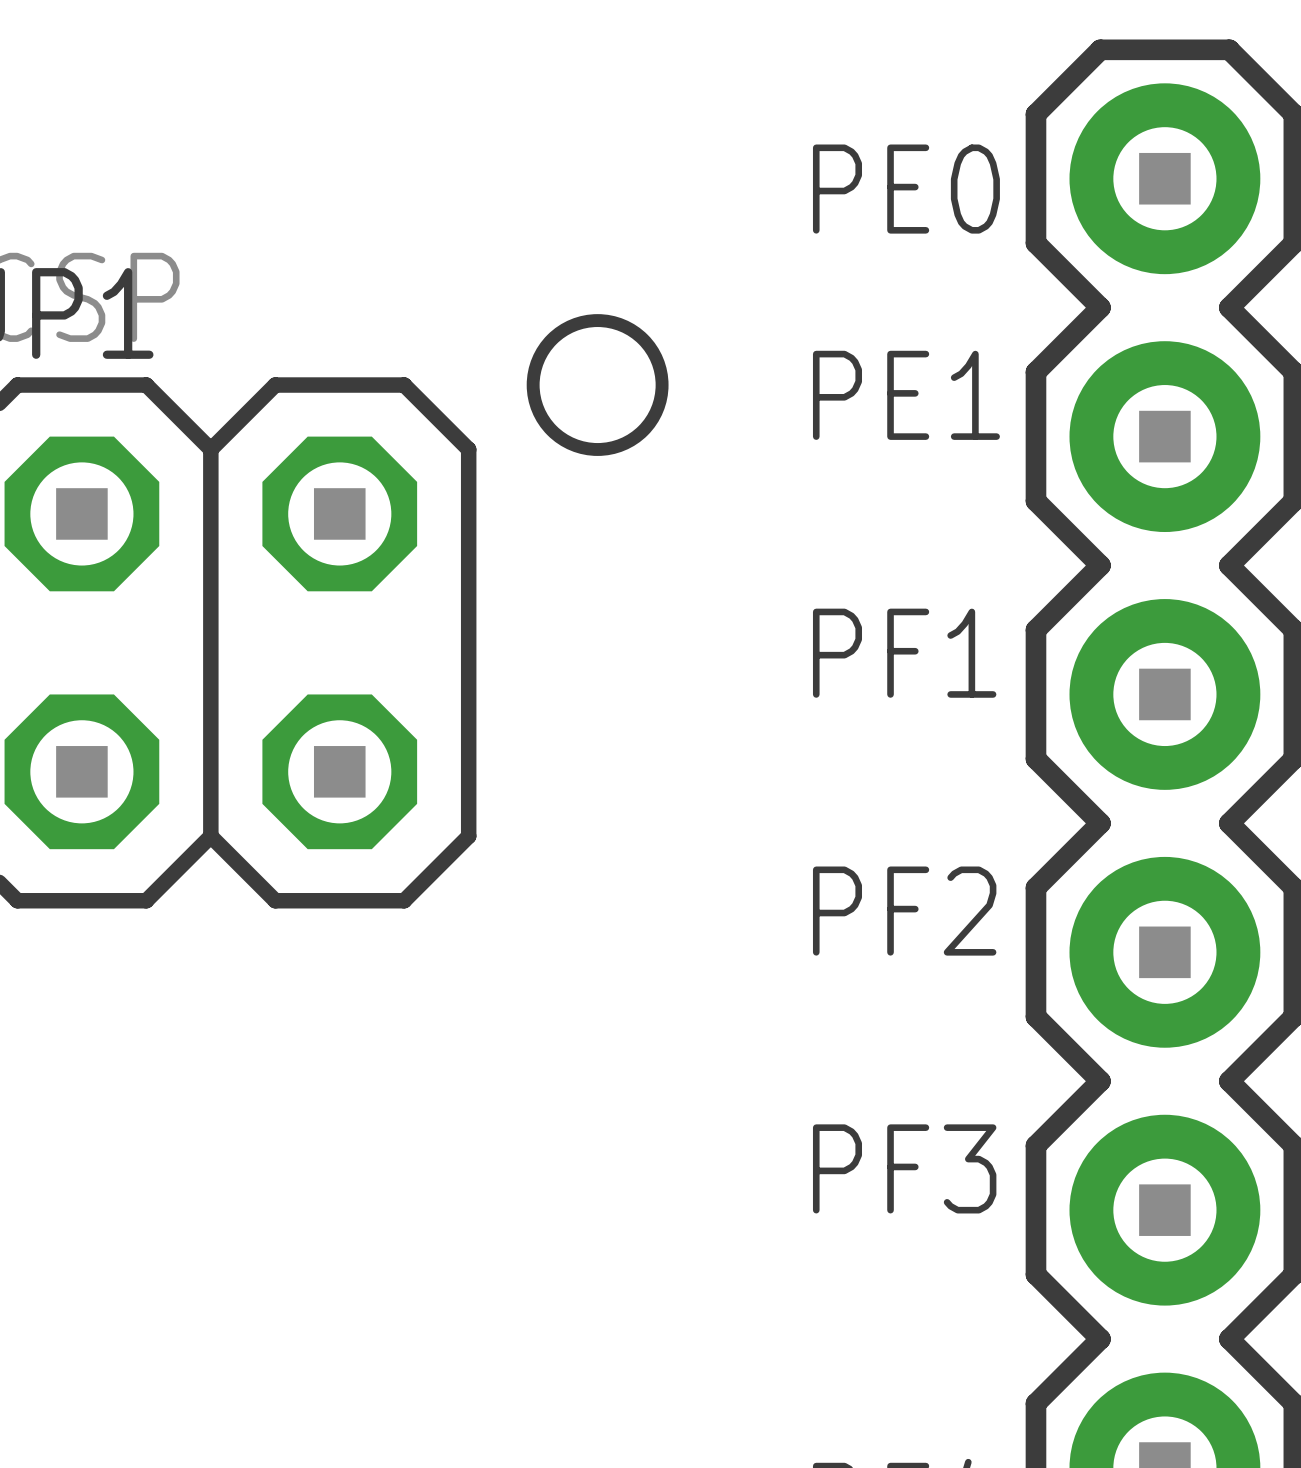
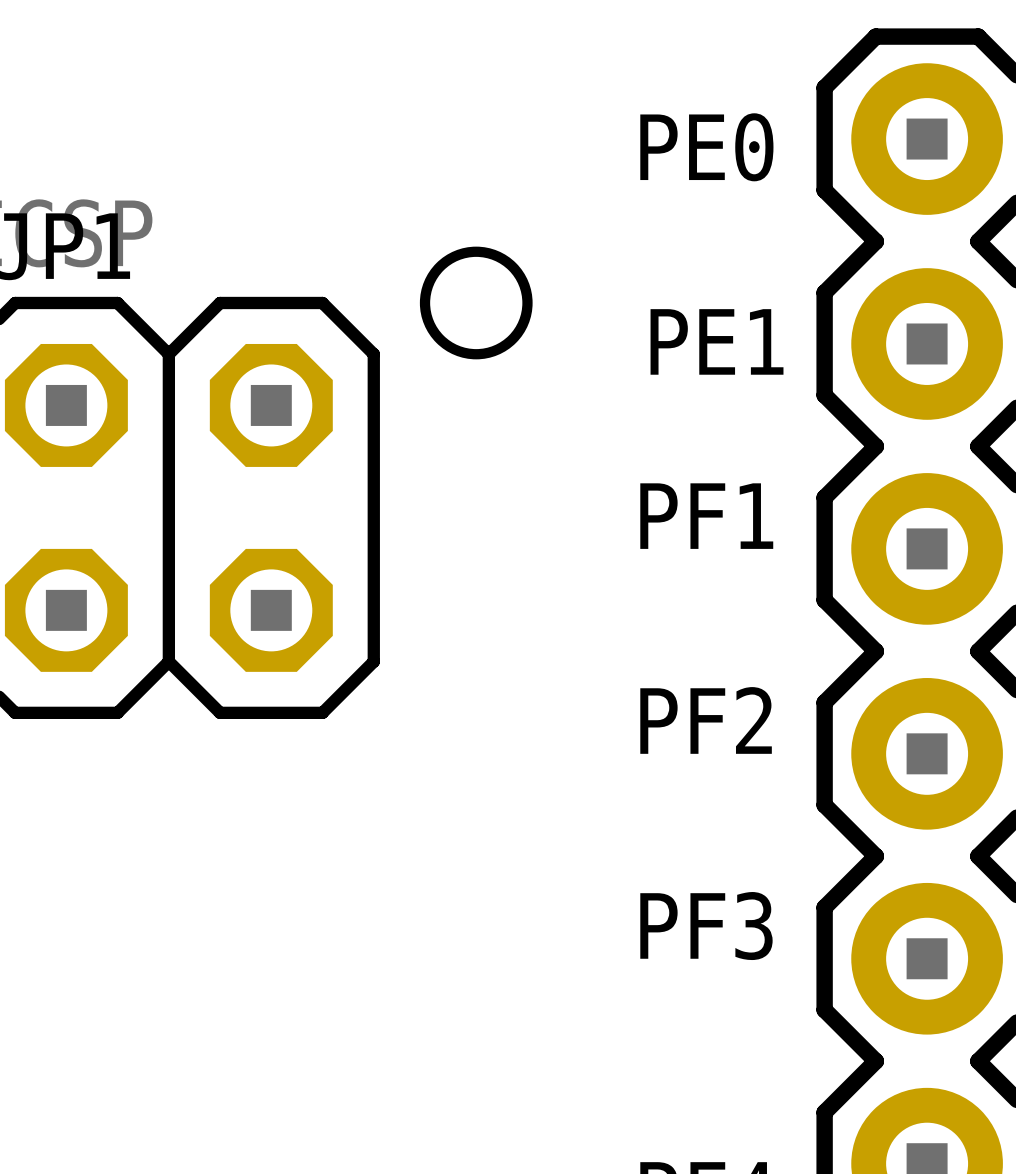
text position: PE1 (906, 395) -> PE1 (717, 341)

